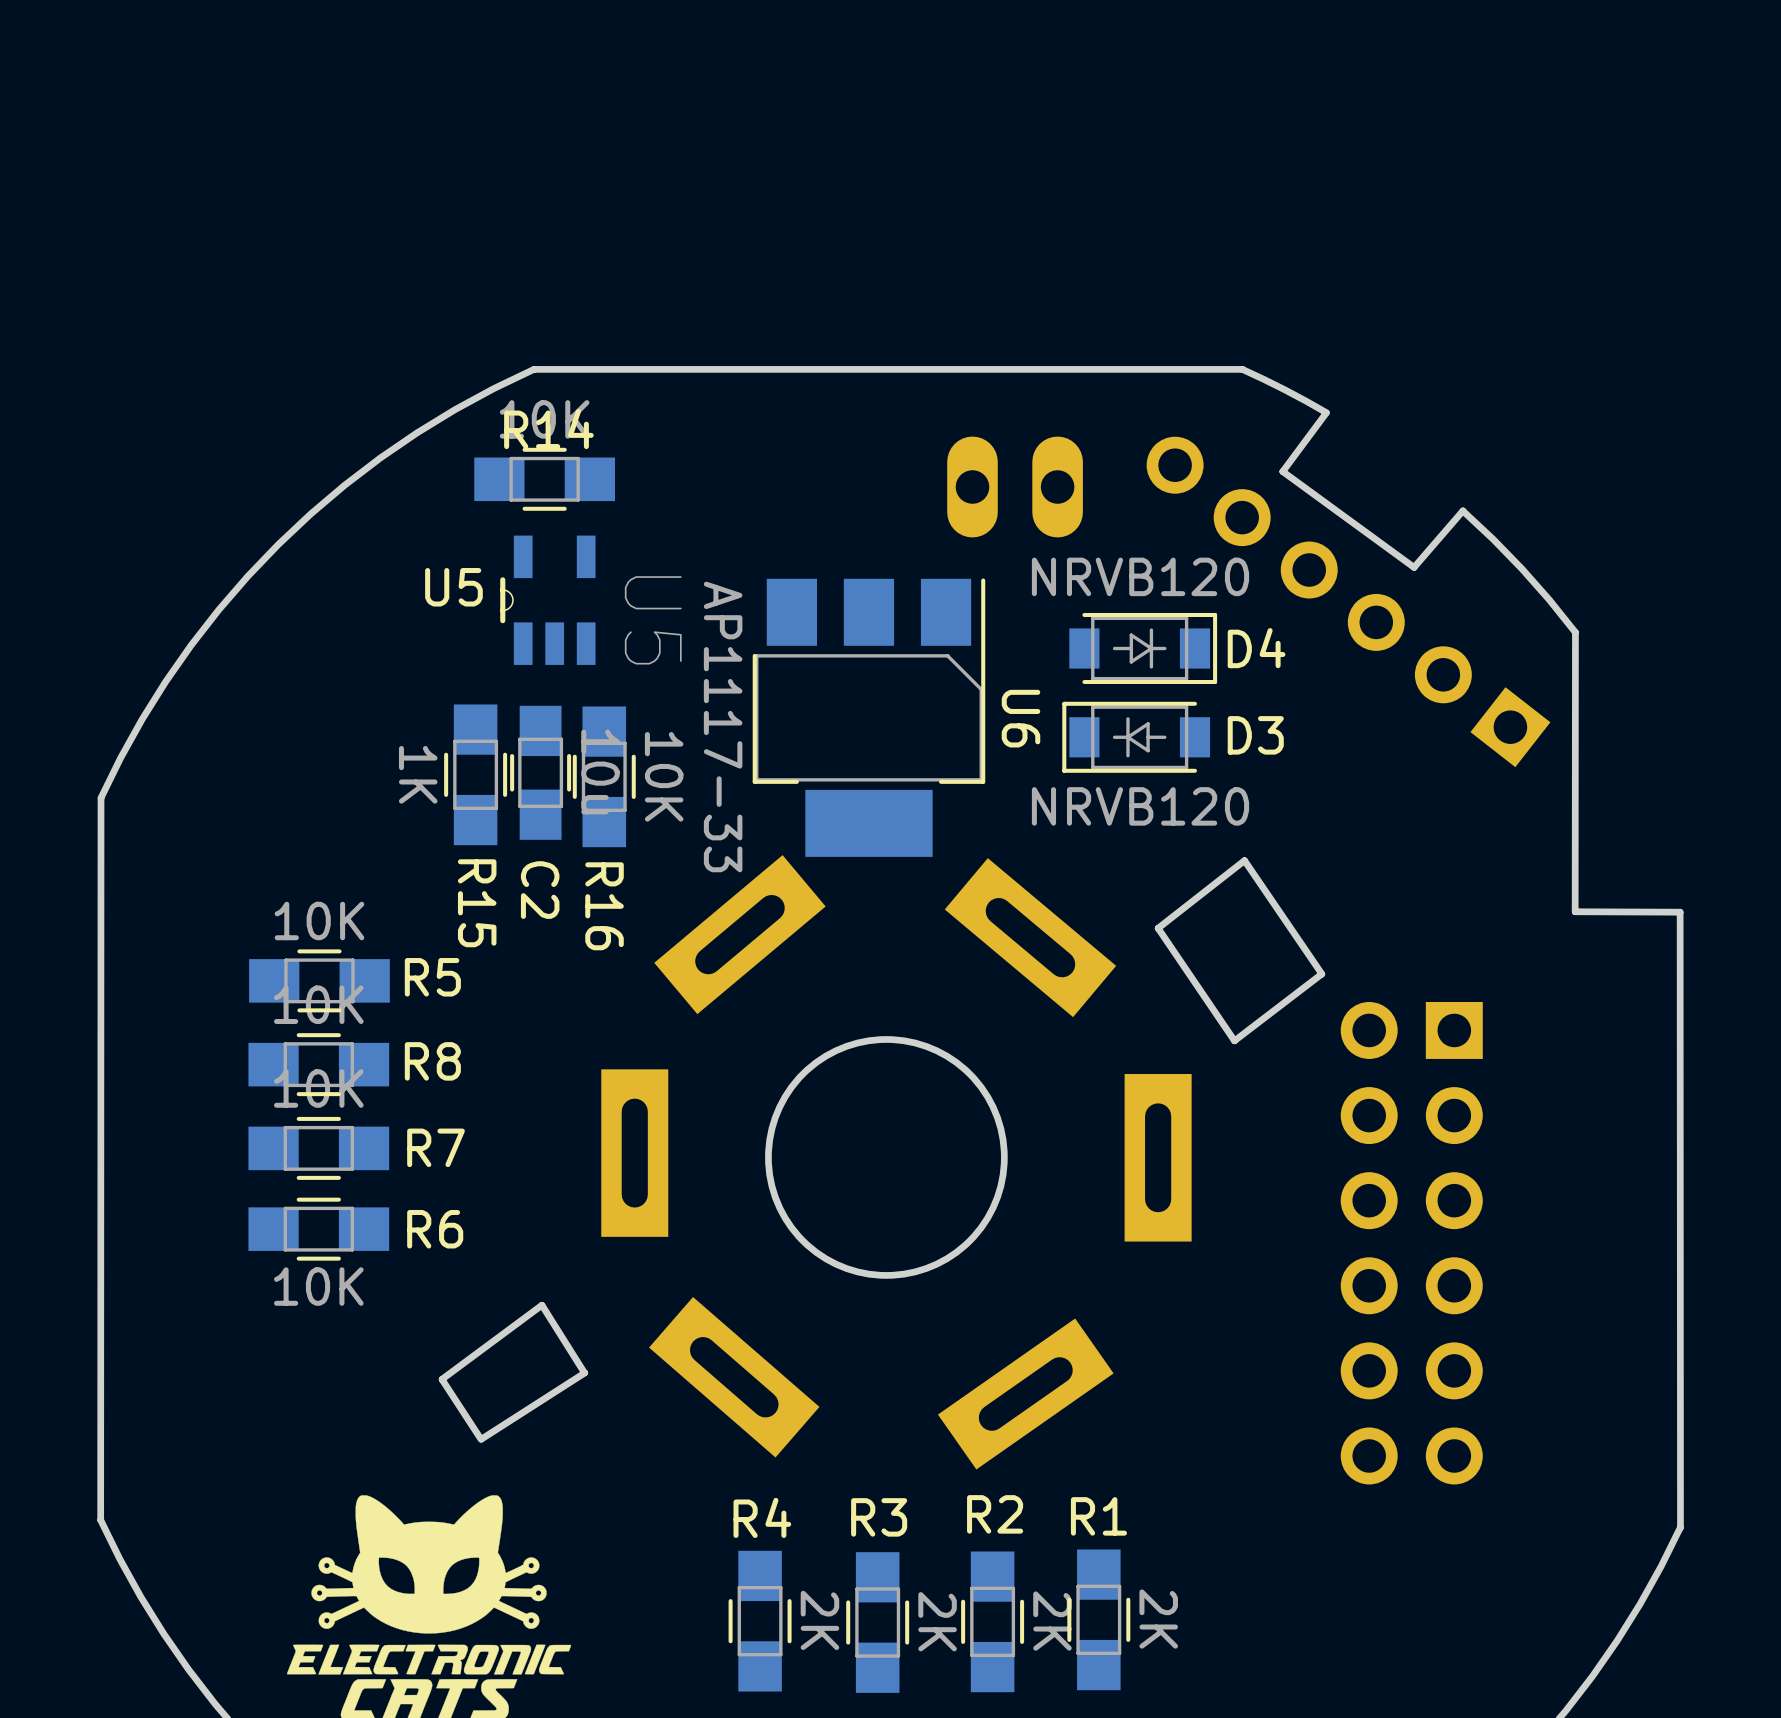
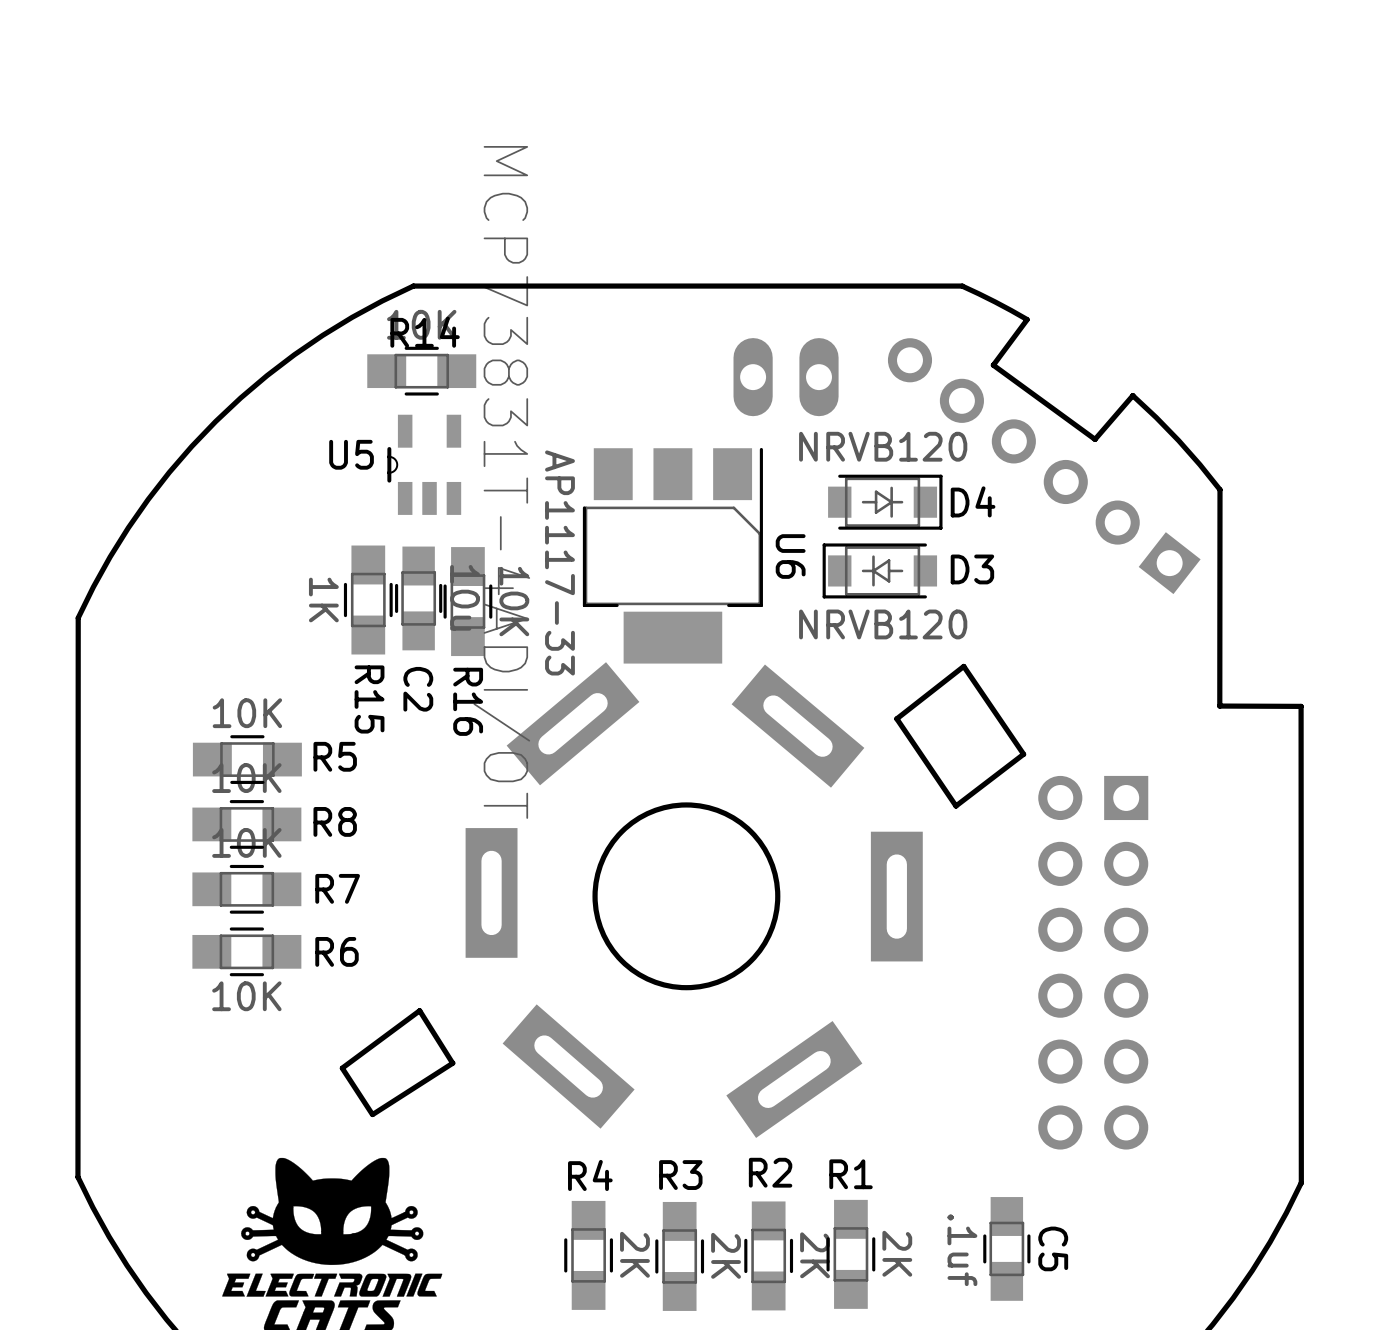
U5 value: U5 (653, 620) -> MCP73831T-4ADI/OT (501, 482)
C5: none -> .1uf (1006, 1248)

